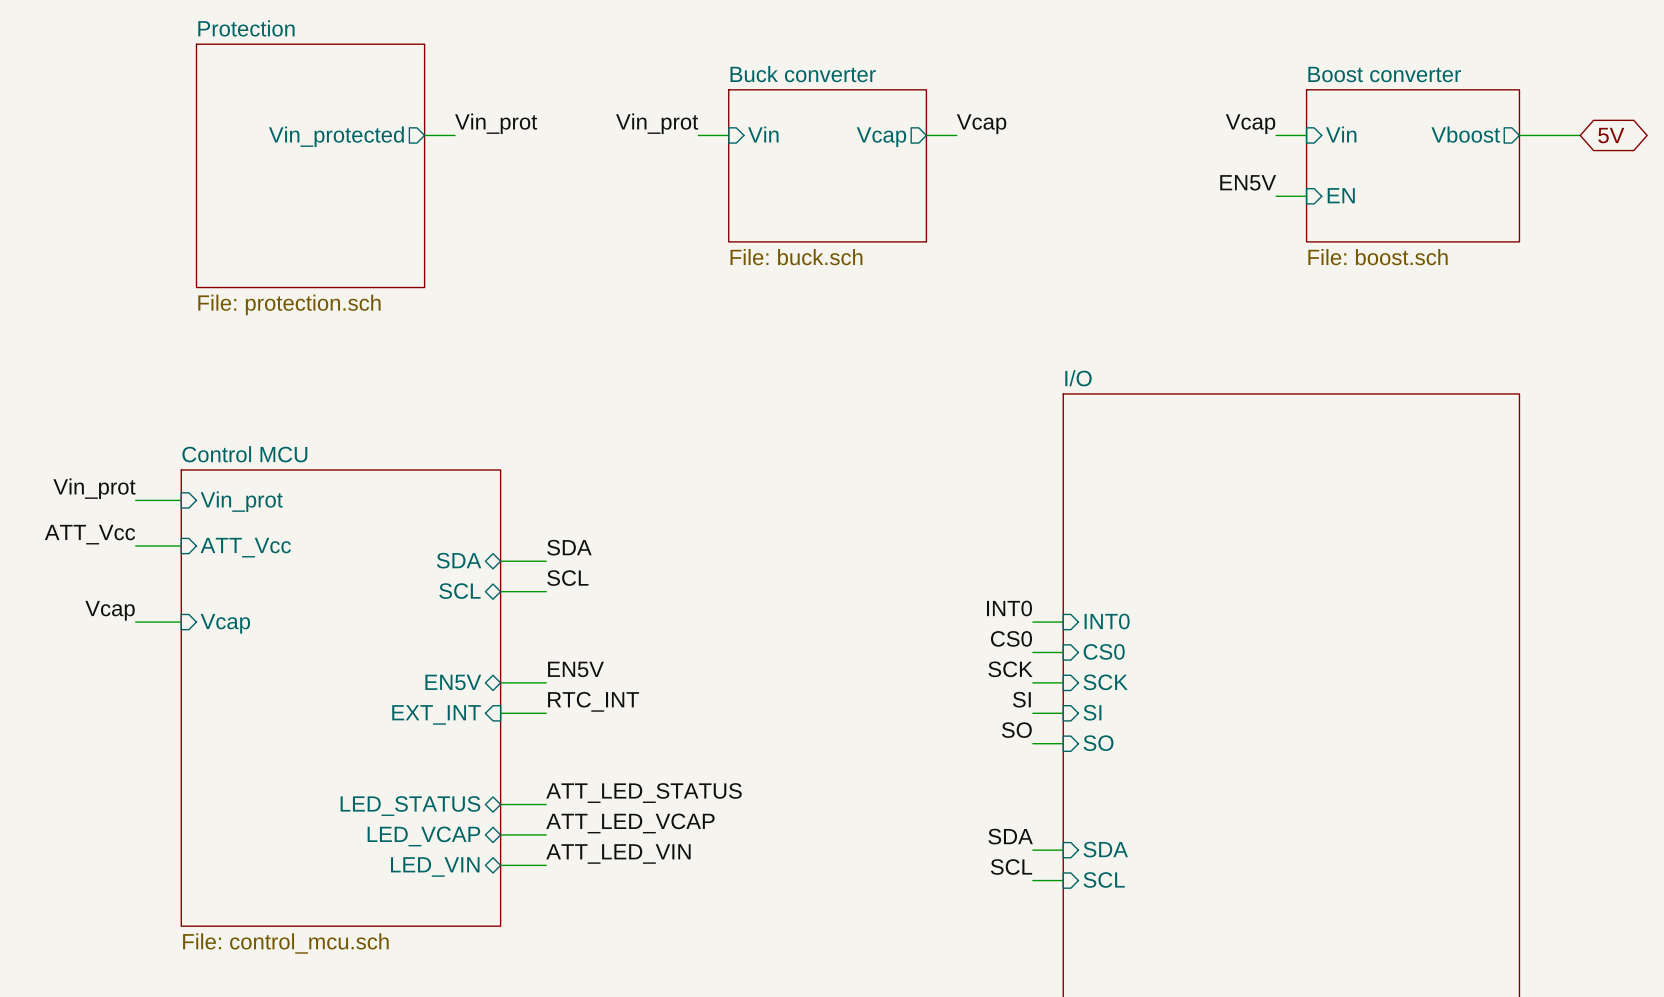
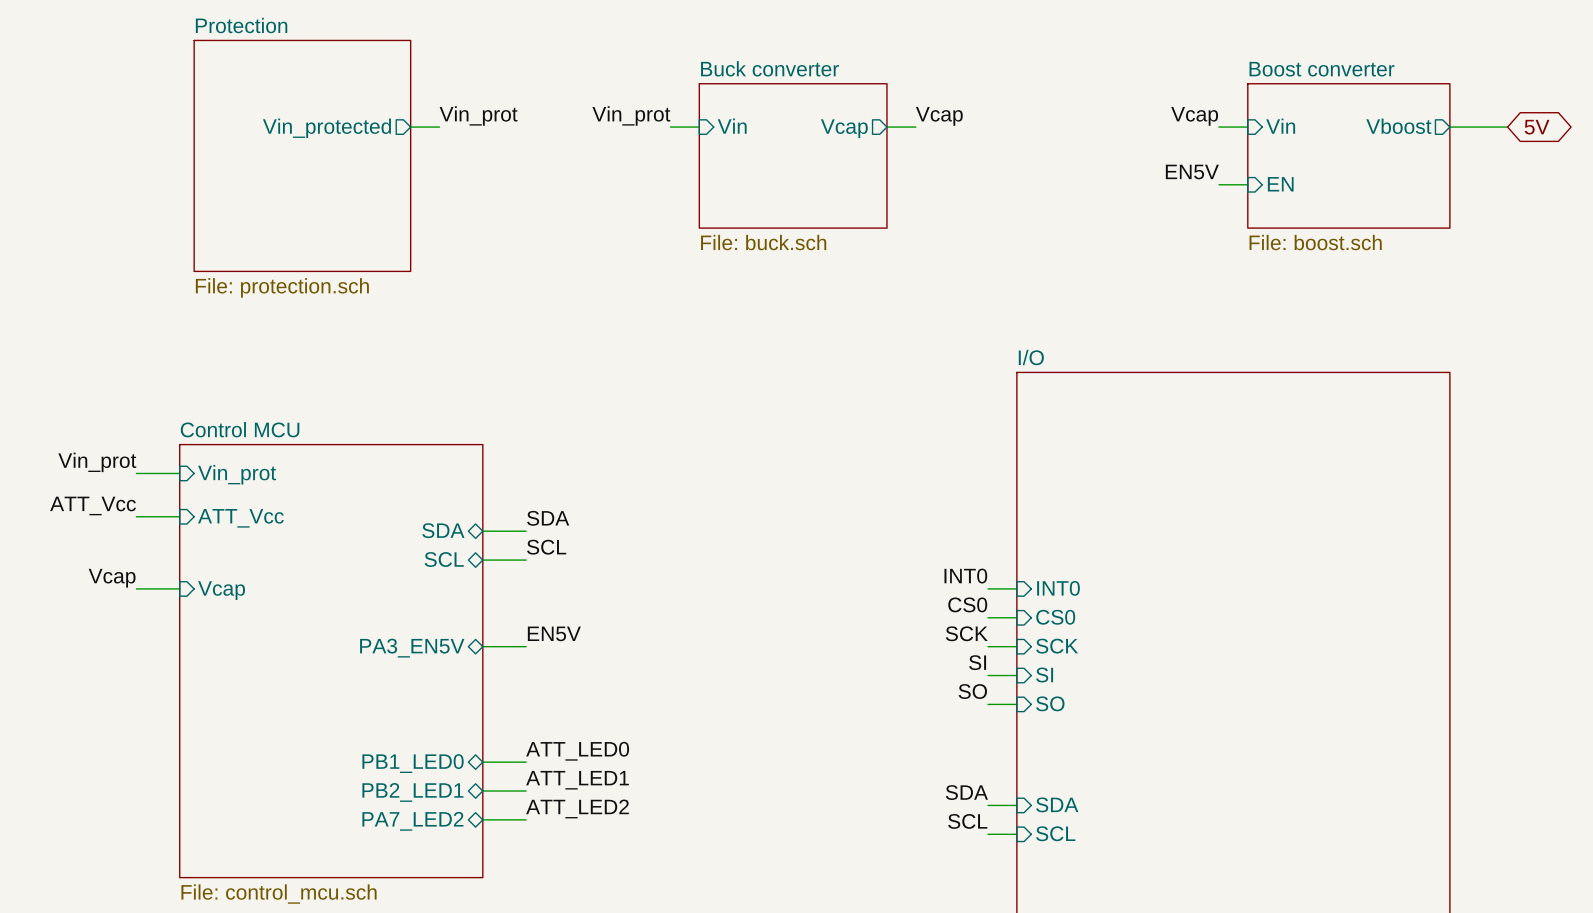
sheet pin: EN5V (453, 682) -> PA3_EN5V (412, 648)
label: RTC_INT (593, 701) -> none
wire: (500, 713) (546, 713) -> none
sheet pin: EXT_INT (436, 714) -> none
label: ATT_LED_STATUS (644, 793) -> ATT_LED0 (577, 751)
sheet pin: LED_STATUS (410, 806) -> PB1_LED0 (413, 763)
label: ATT_LED_VCAP (630, 823) -> ATT_LED1 (577, 780)
sheet pin: LED_VCAP (423, 836) -> PB2_LED1 (412, 792)
label: ATT_LED_VIN (618, 853) -> ATT_LED2 (577, 808)
sheet pin: LED_VIN (435, 866) -> PA7_LED2 (412, 821)

